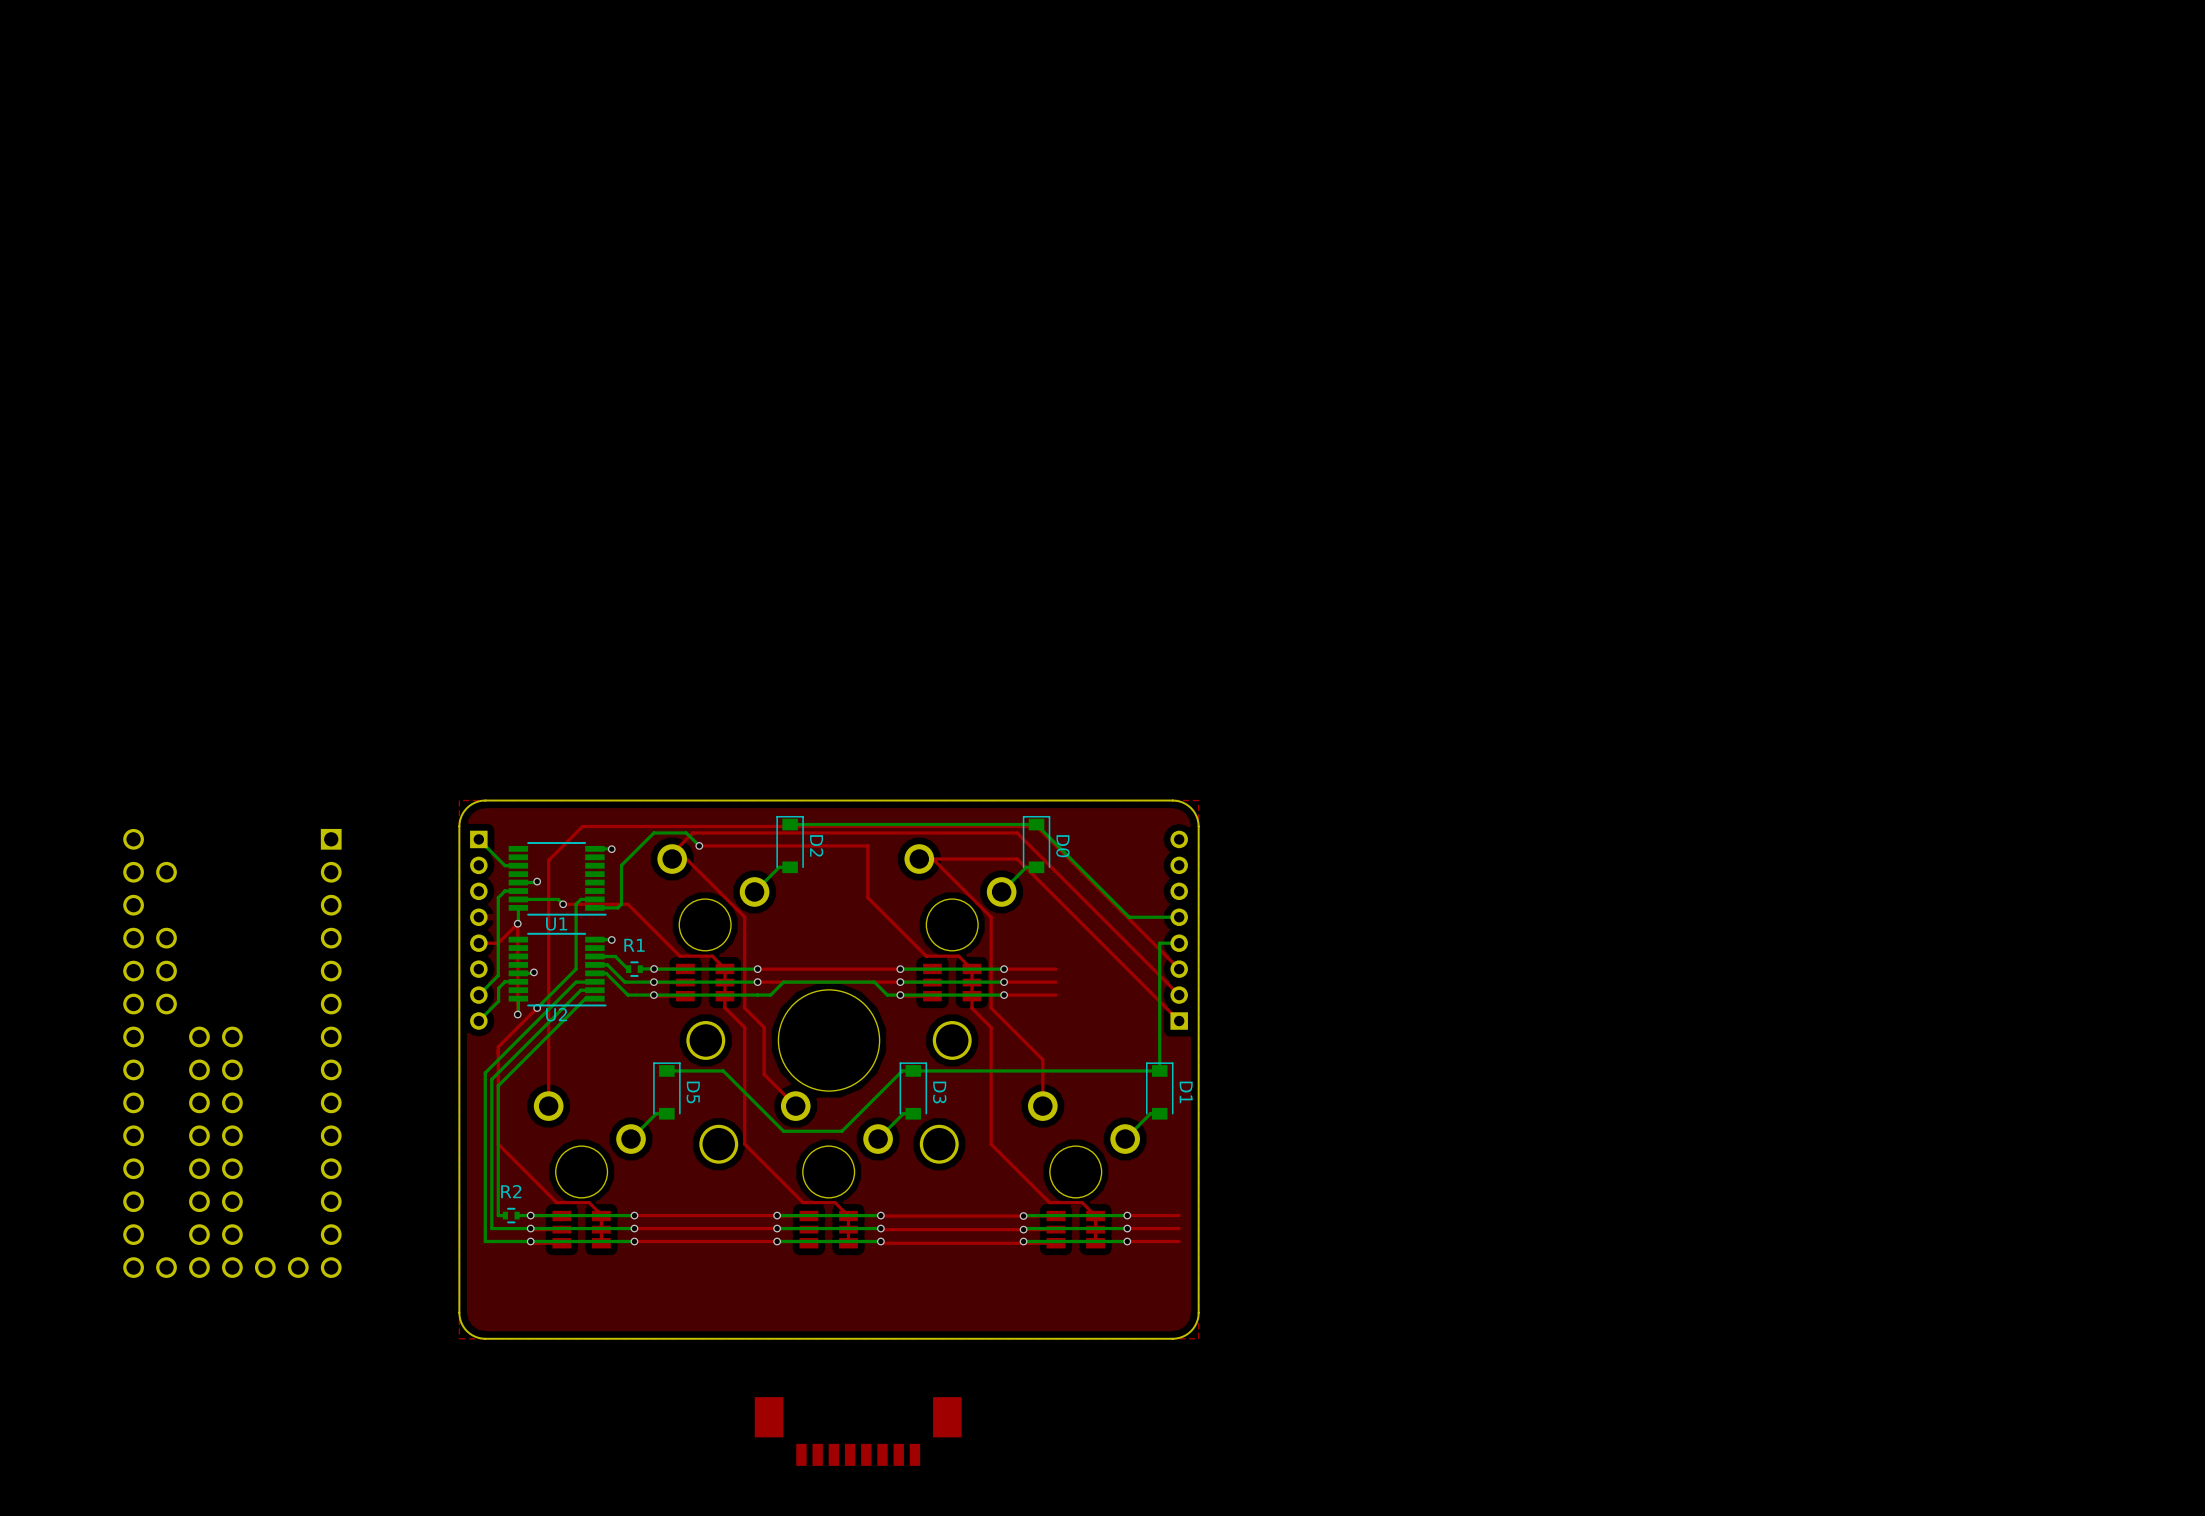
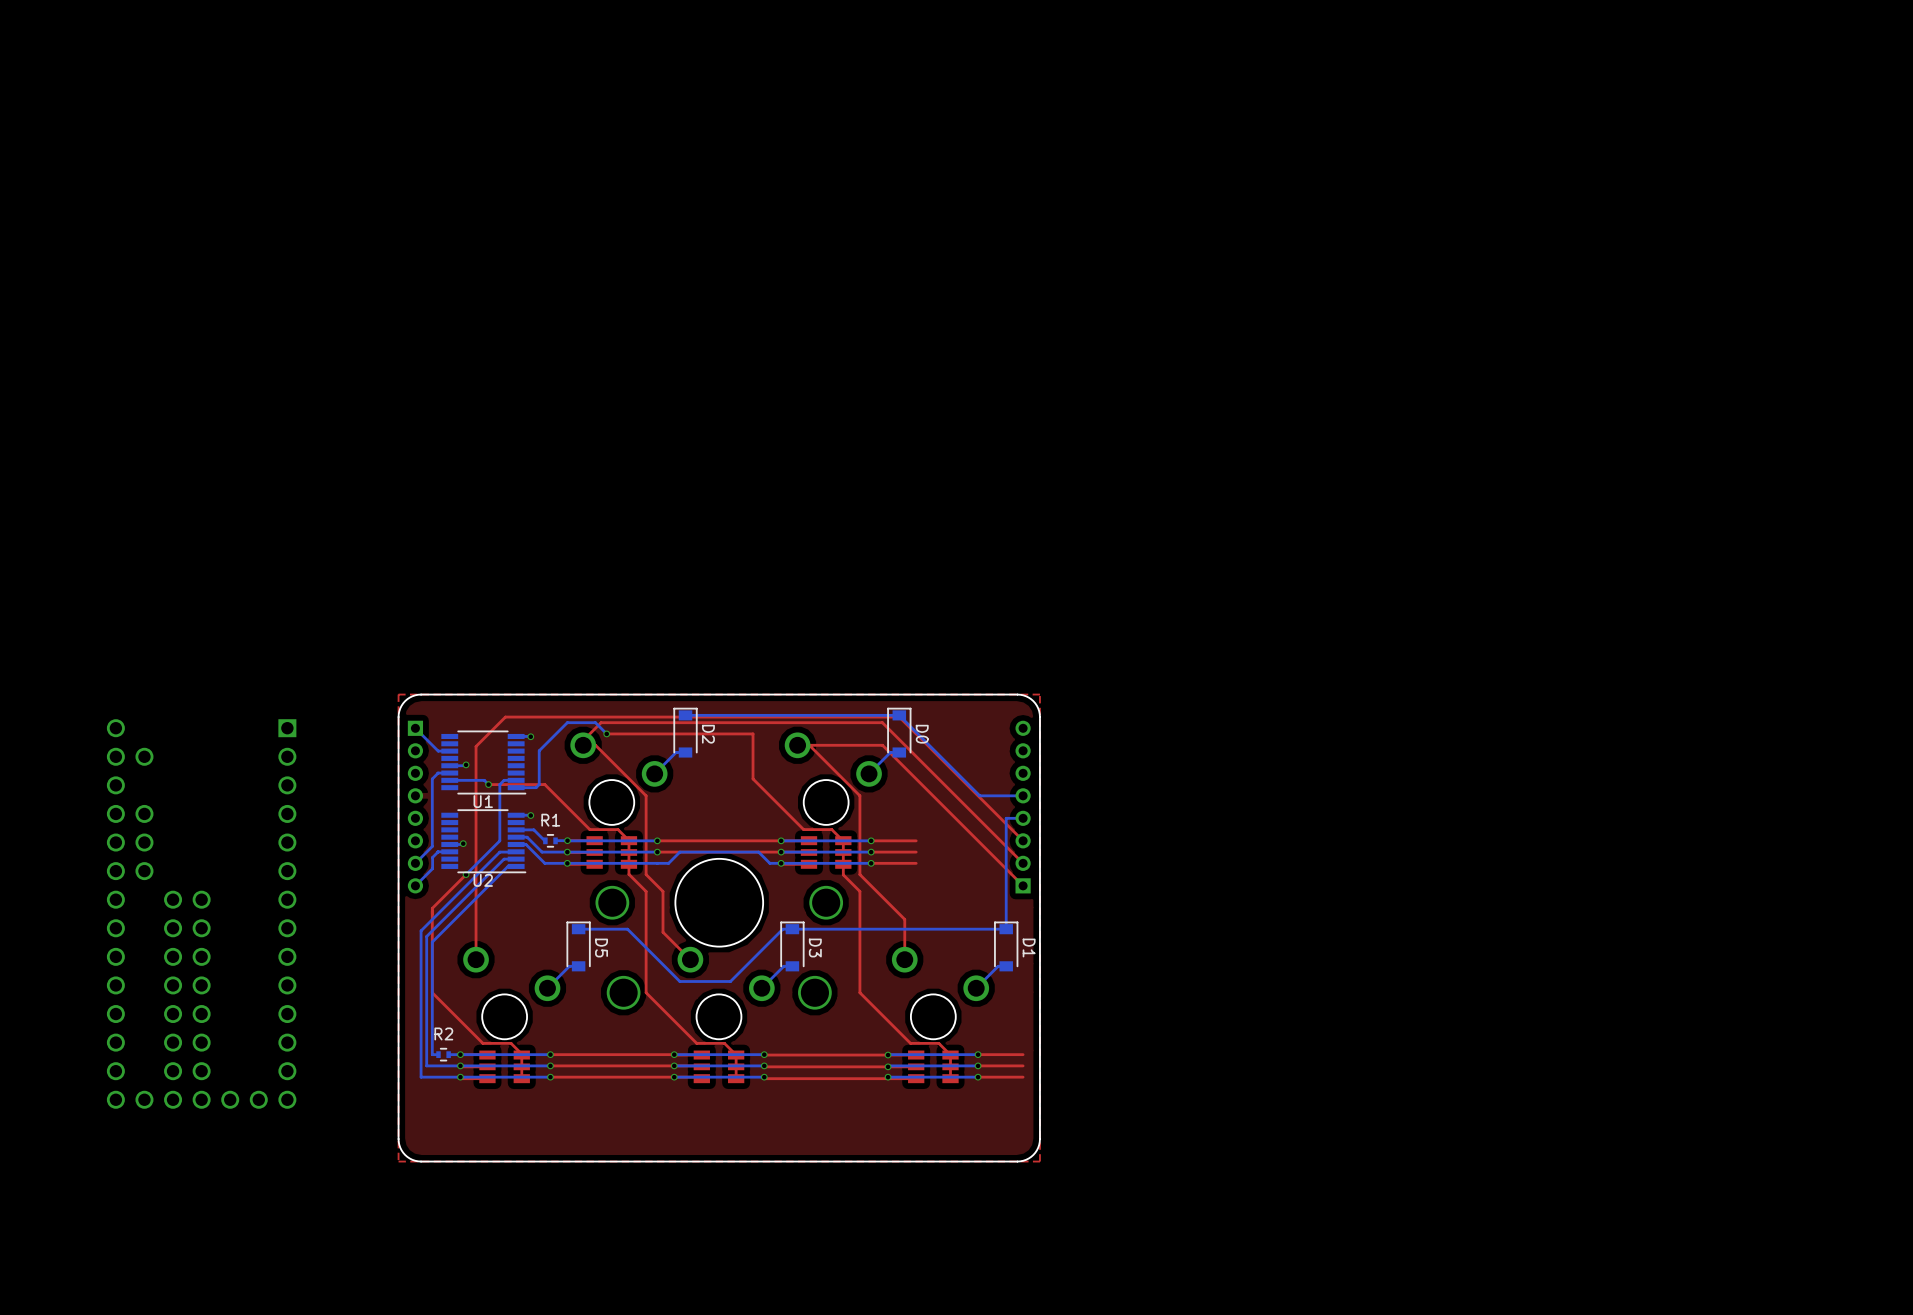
bottom track: (518, 907) (517, 923) -> none
via: (517, 923) -> none
top track: (478, 943) (498, 943) (517, 923) (517, 1014) -> none
bottom track: (518, 998) (517, 1014) -> none
via: (517, 1014) -> none
part: (858, 1431) -> none

